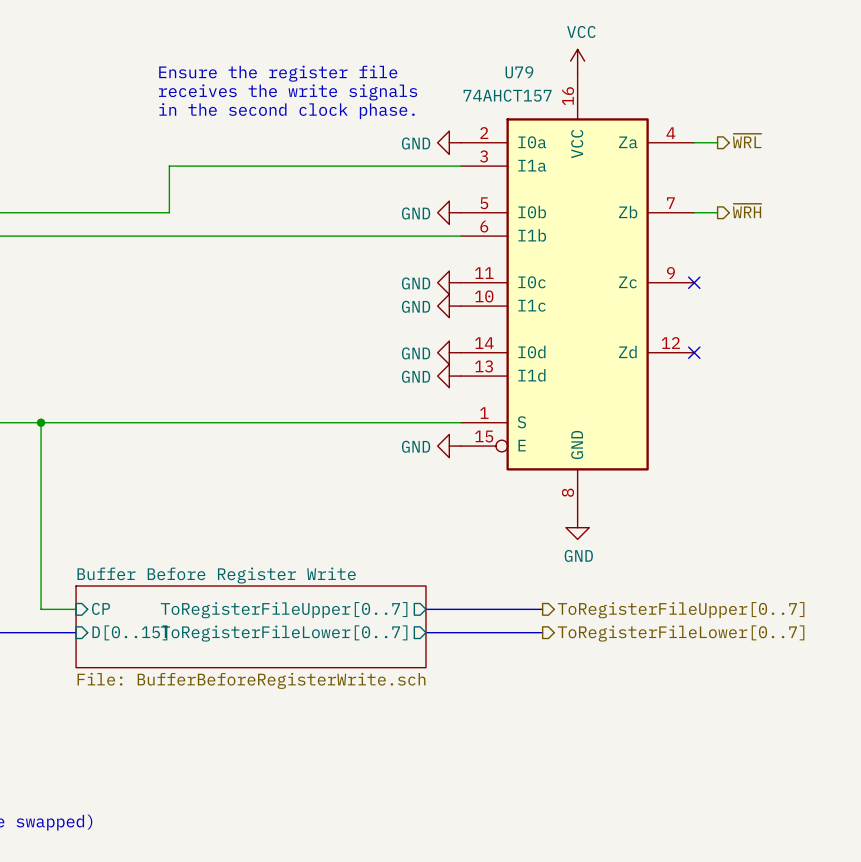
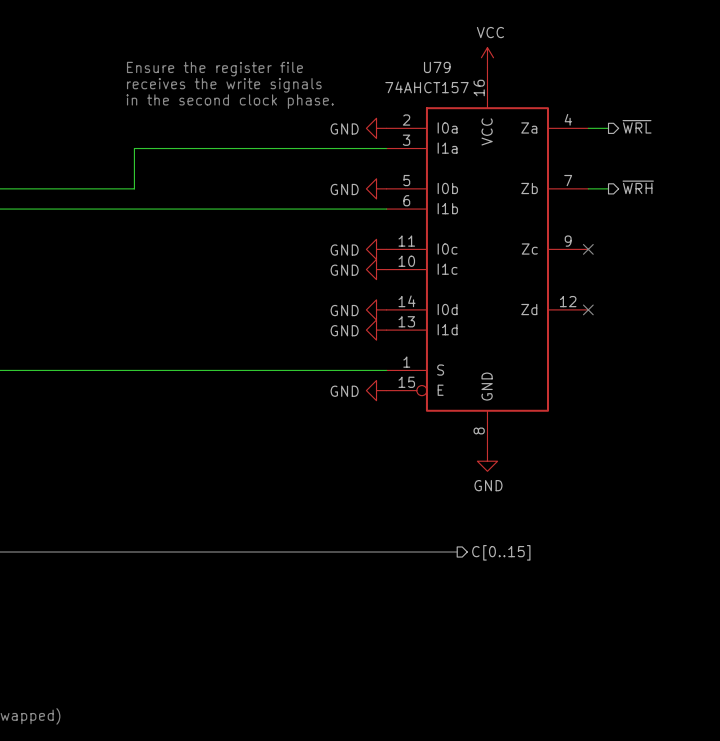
wire: (41, 422) (41, 609) (76, 609) -> none
junction: (41, 422) -> none
sheet pin: CP (100, 608) -> none
bus: (425, 609) (542, 609) -> none
sheet pin: ToRegisterFileUpper[0..7] (284, 610) -> none
hierarchical label: ToRegisterFileUpper[0..7] (681, 610) -> none
sheet Buffer Before Register Write: File: BufferBeforeRegisterWrite.sch (251, 626) -> none
bus: none -> (53, 552) (356, 552)
sheet pin: D[0..15] (129, 632) -> none
sheet pin: ToRegisterFileLower[0..7] (284, 633) -> none
hierarchical label: ToRegisterFileLower[0..7] (681, 633) -> C[0..15] (501, 552)

